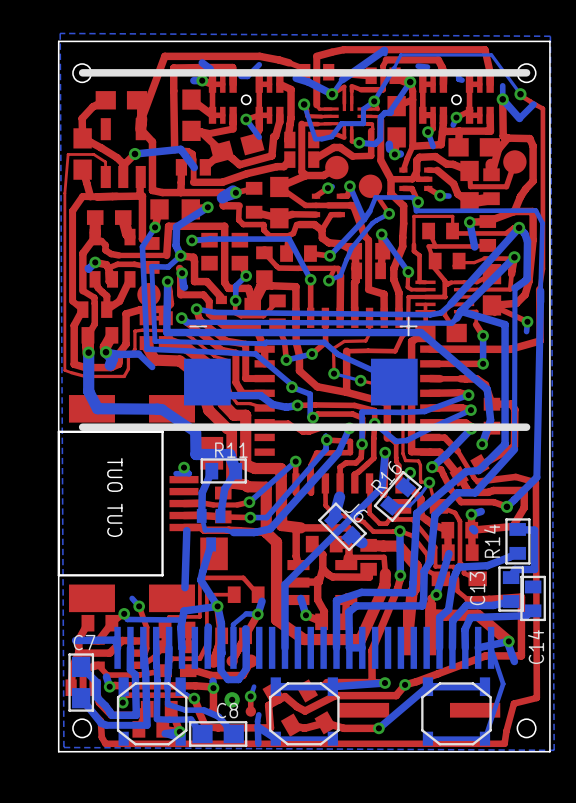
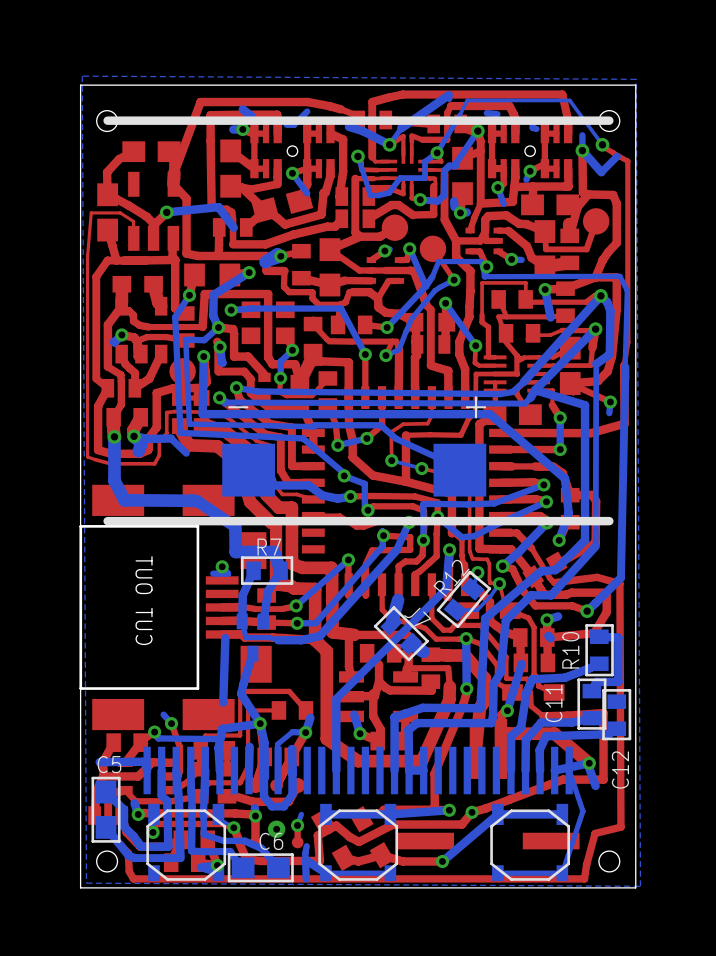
R11 name: R11 (231, 450) -> R7 (269, 547)
R16 name: R16 (386, 477) -> R12 (451, 578)
J6 name: J6 (356, 513) -> J7 (417, 616)
R14 name: R14 (492, 541) -> R10 (570, 650)
C13 name: C13 (477, 588) -> C11 (553, 703)
C7 name: C7 (84, 642) -> C5 (109, 764)
C14 name: C14 (536, 647) -> C12 (620, 770)
C8 name: C8 (227, 710) -> C6 (271, 841)

